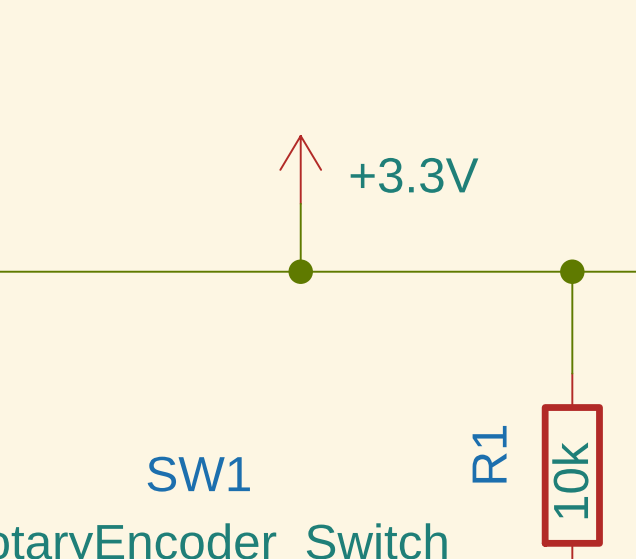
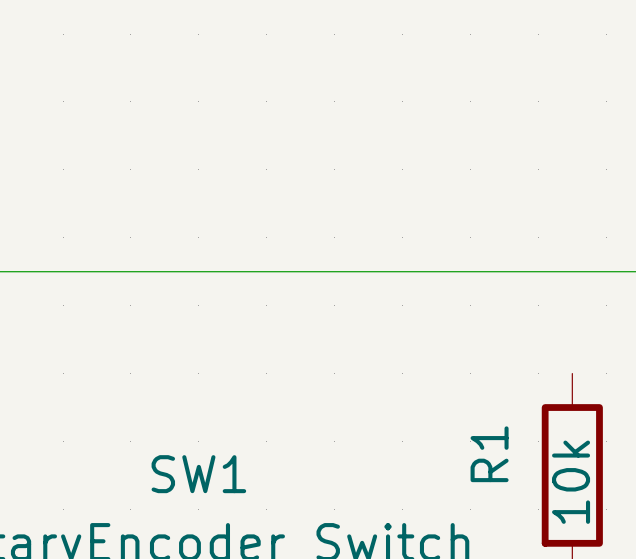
power symbol: +3.3V (300, 169) -> none
wire: (300, 203) (300, 271) -> none
junction: (300, 271) -> none
wire: (572, 271) (572, 373) -> none
junction: (572, 271) -> none

